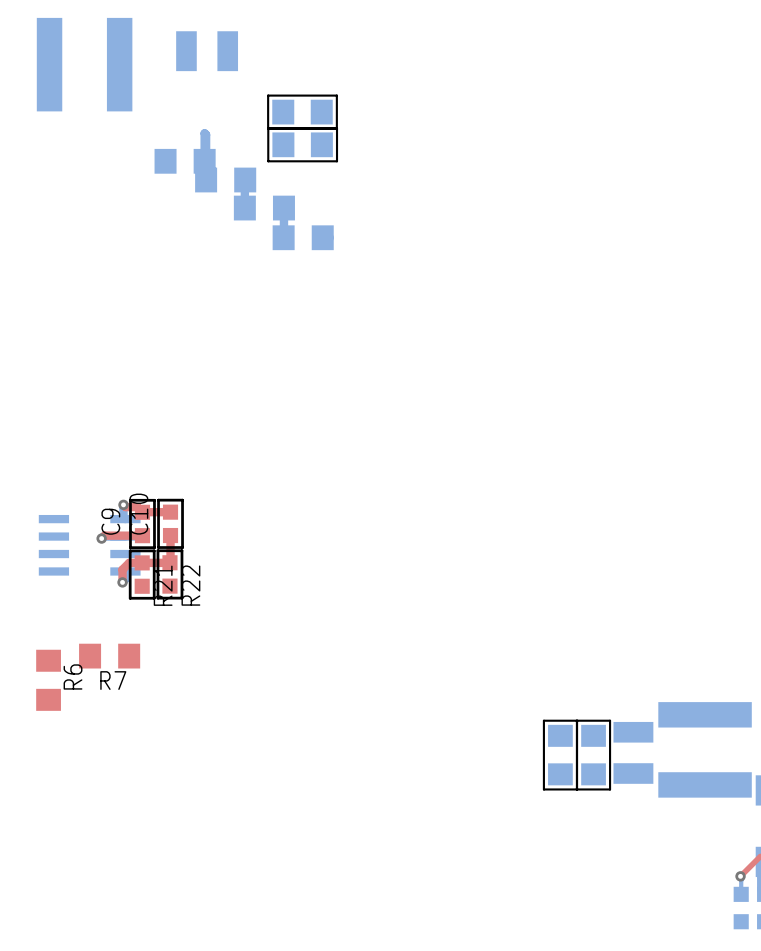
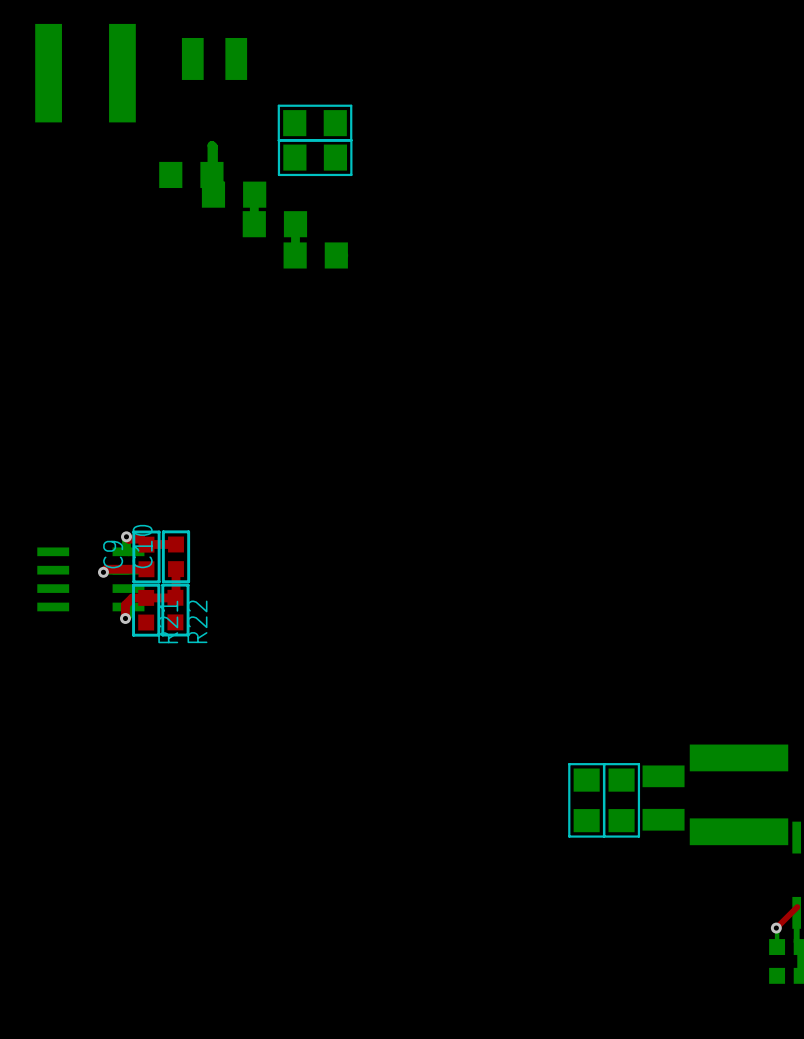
R7: (109, 656) -> none
R6: (48, 680) -> none

